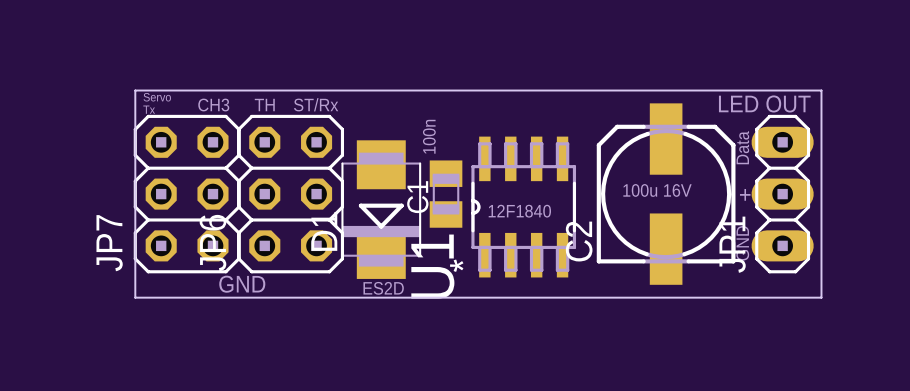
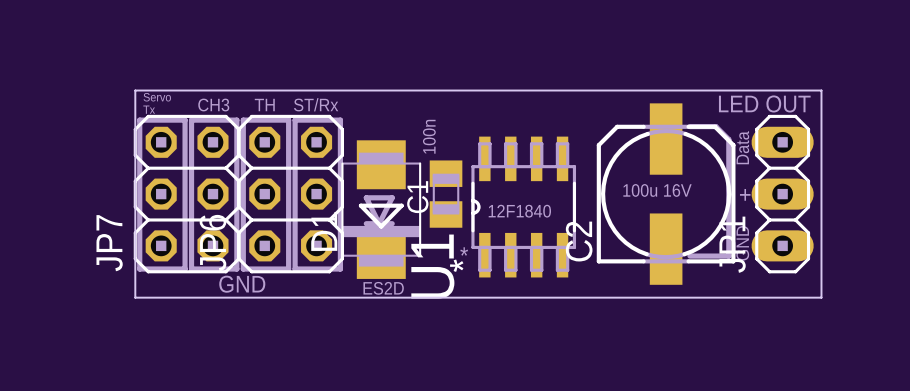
line: none -> (139, 120) (139, 269) (185, 269) (185, 120) (139, 120)
line: none -> (191, 120) (236, 120) (236, 269) (191, 269) (191, 120)
line: none -> (243, 120) (288, 120) (288, 269) (243, 269) (243, 120)
line: none -> (295, 120) (340, 120) (340, 269) (295, 269) (295, 120)
line: none -> (689, 126) (715, 126) (728, 139) (728, 256) (689, 256)
line: none -> (366, 197) (379, 223) (392, 197) (366, 197)
line: none -> (366, 223) (392, 223)
text: none -> * (464, 251)

